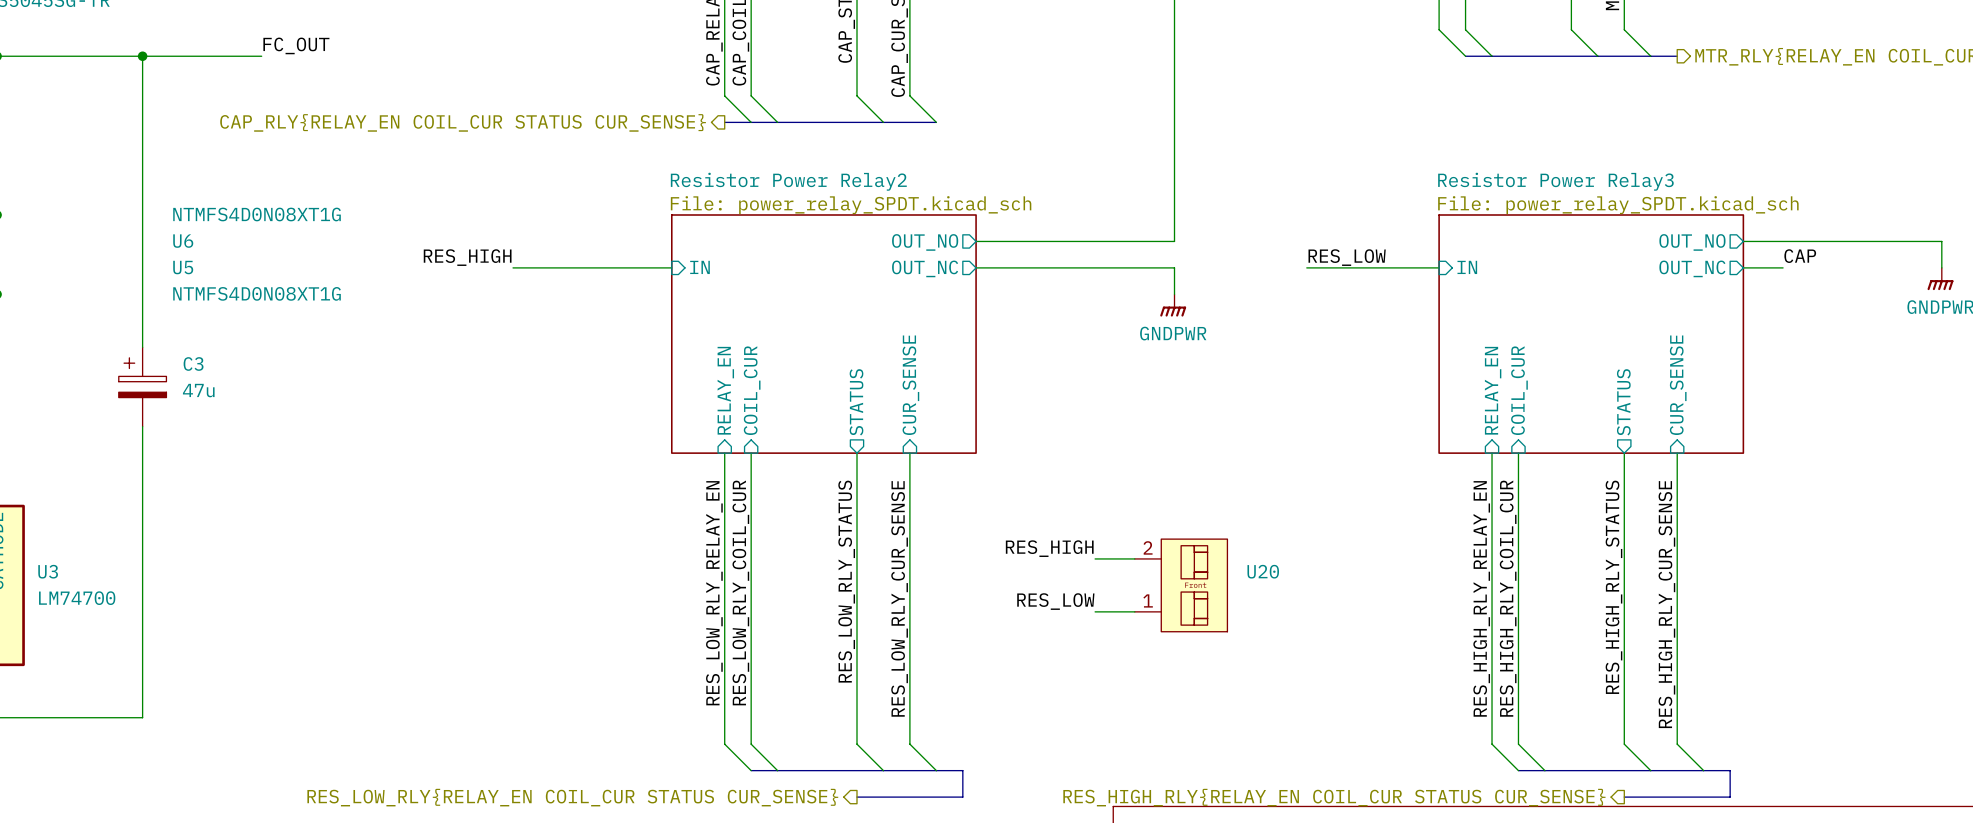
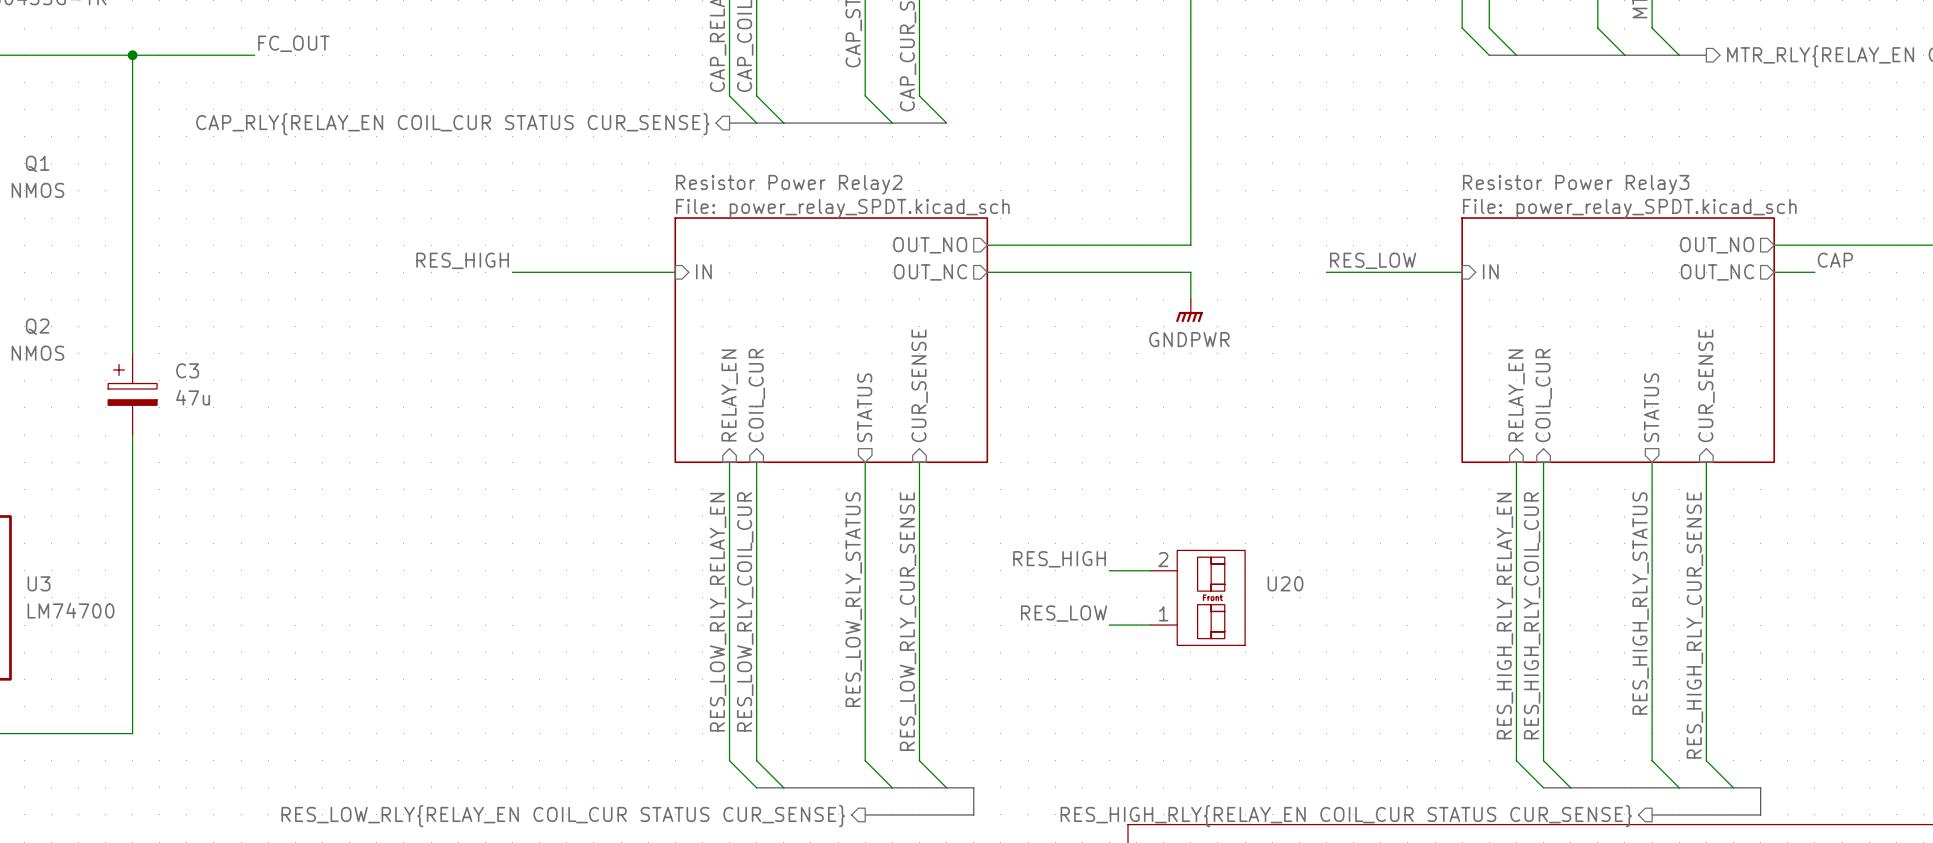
U6 value: NTMFS4D0N08XT1G (257, 214) -> NMOS (37, 190)
U6 name: U6 (183, 241) -> Q1 (37, 163)
U5 name: U5 (183, 267) -> Q2 (37, 326)
U5 value: NTMFS4D0N08XT1G (257, 293) -> NMOS (37, 353)

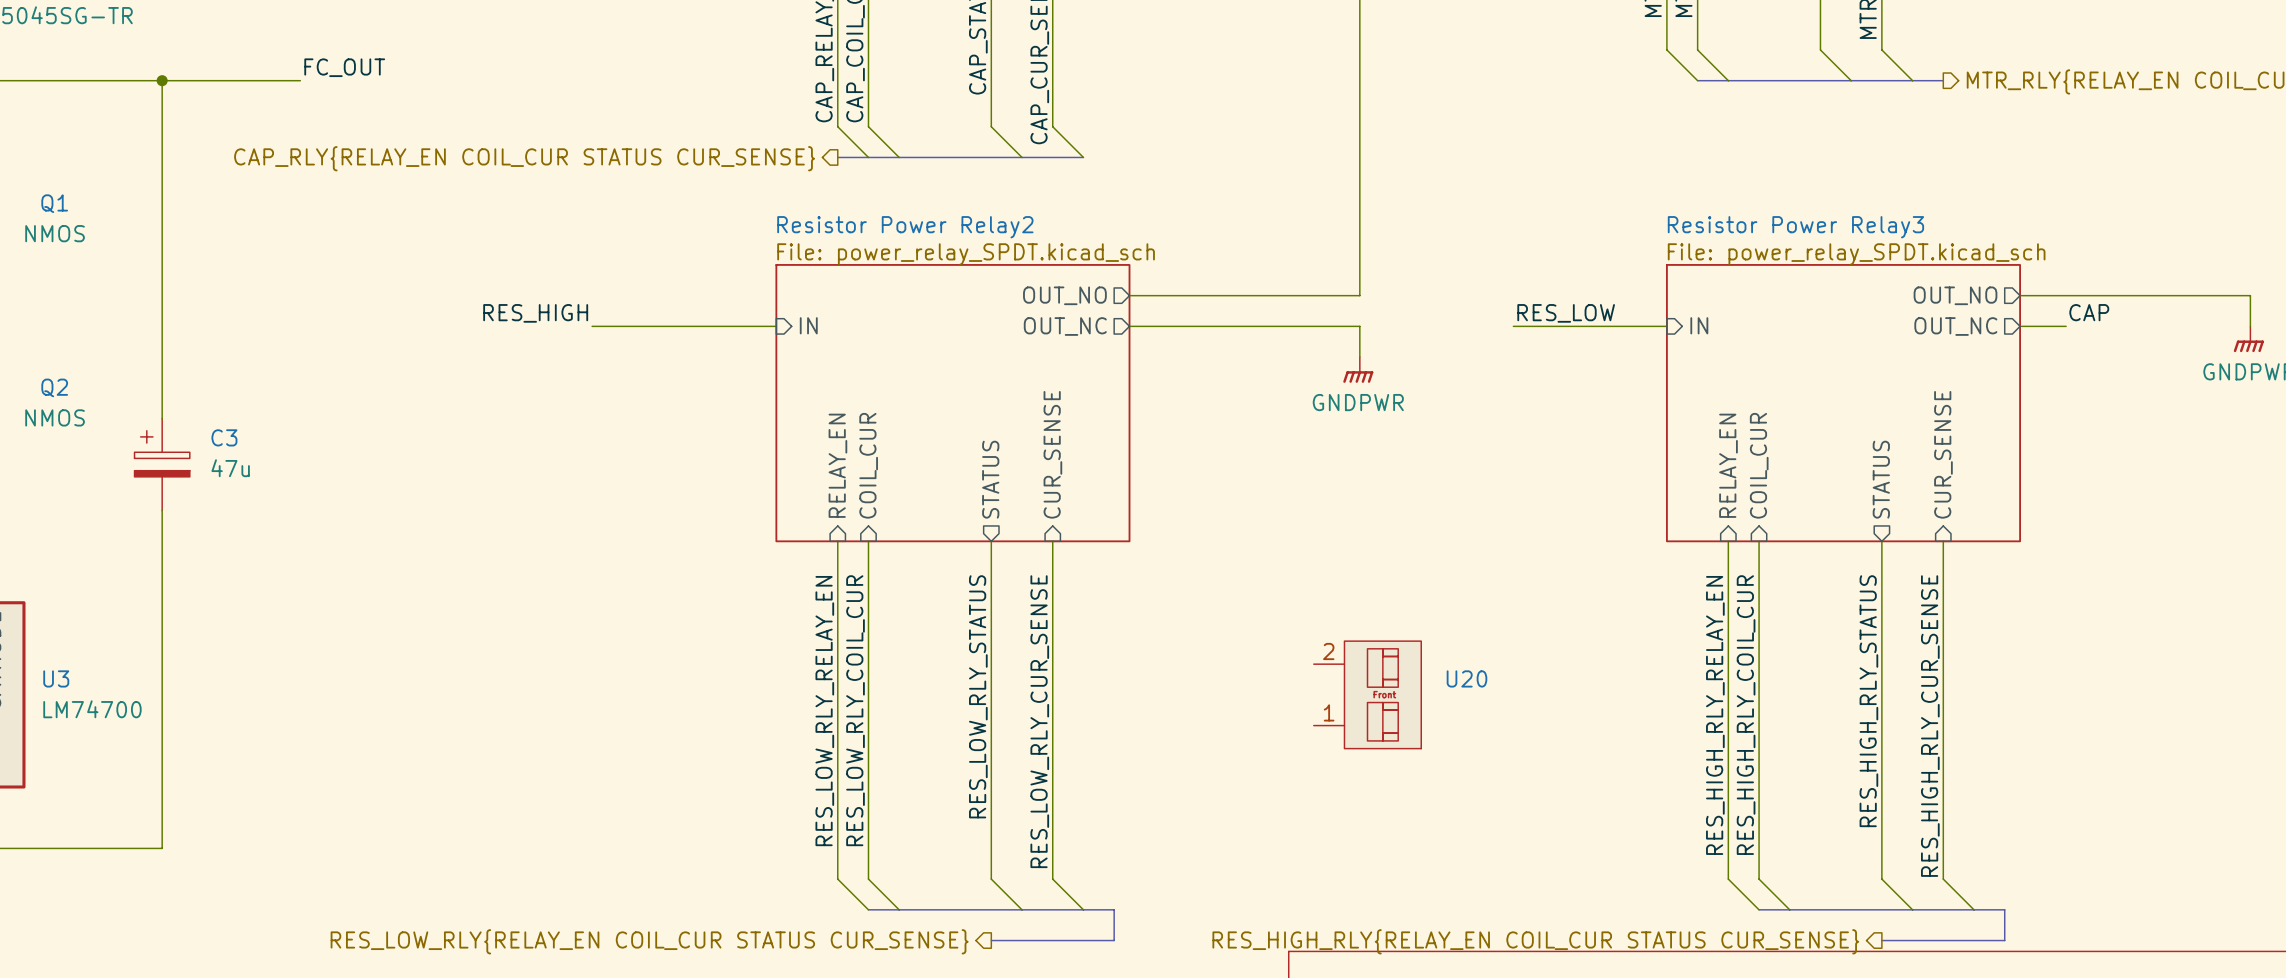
label: RES_HIGH (1059, 559) -> none
wire: (1109, 570) (1150, 570) -> none
label: RES_LOW (1064, 613) -> none
wire: (1109, 625) (1150, 625) -> none

